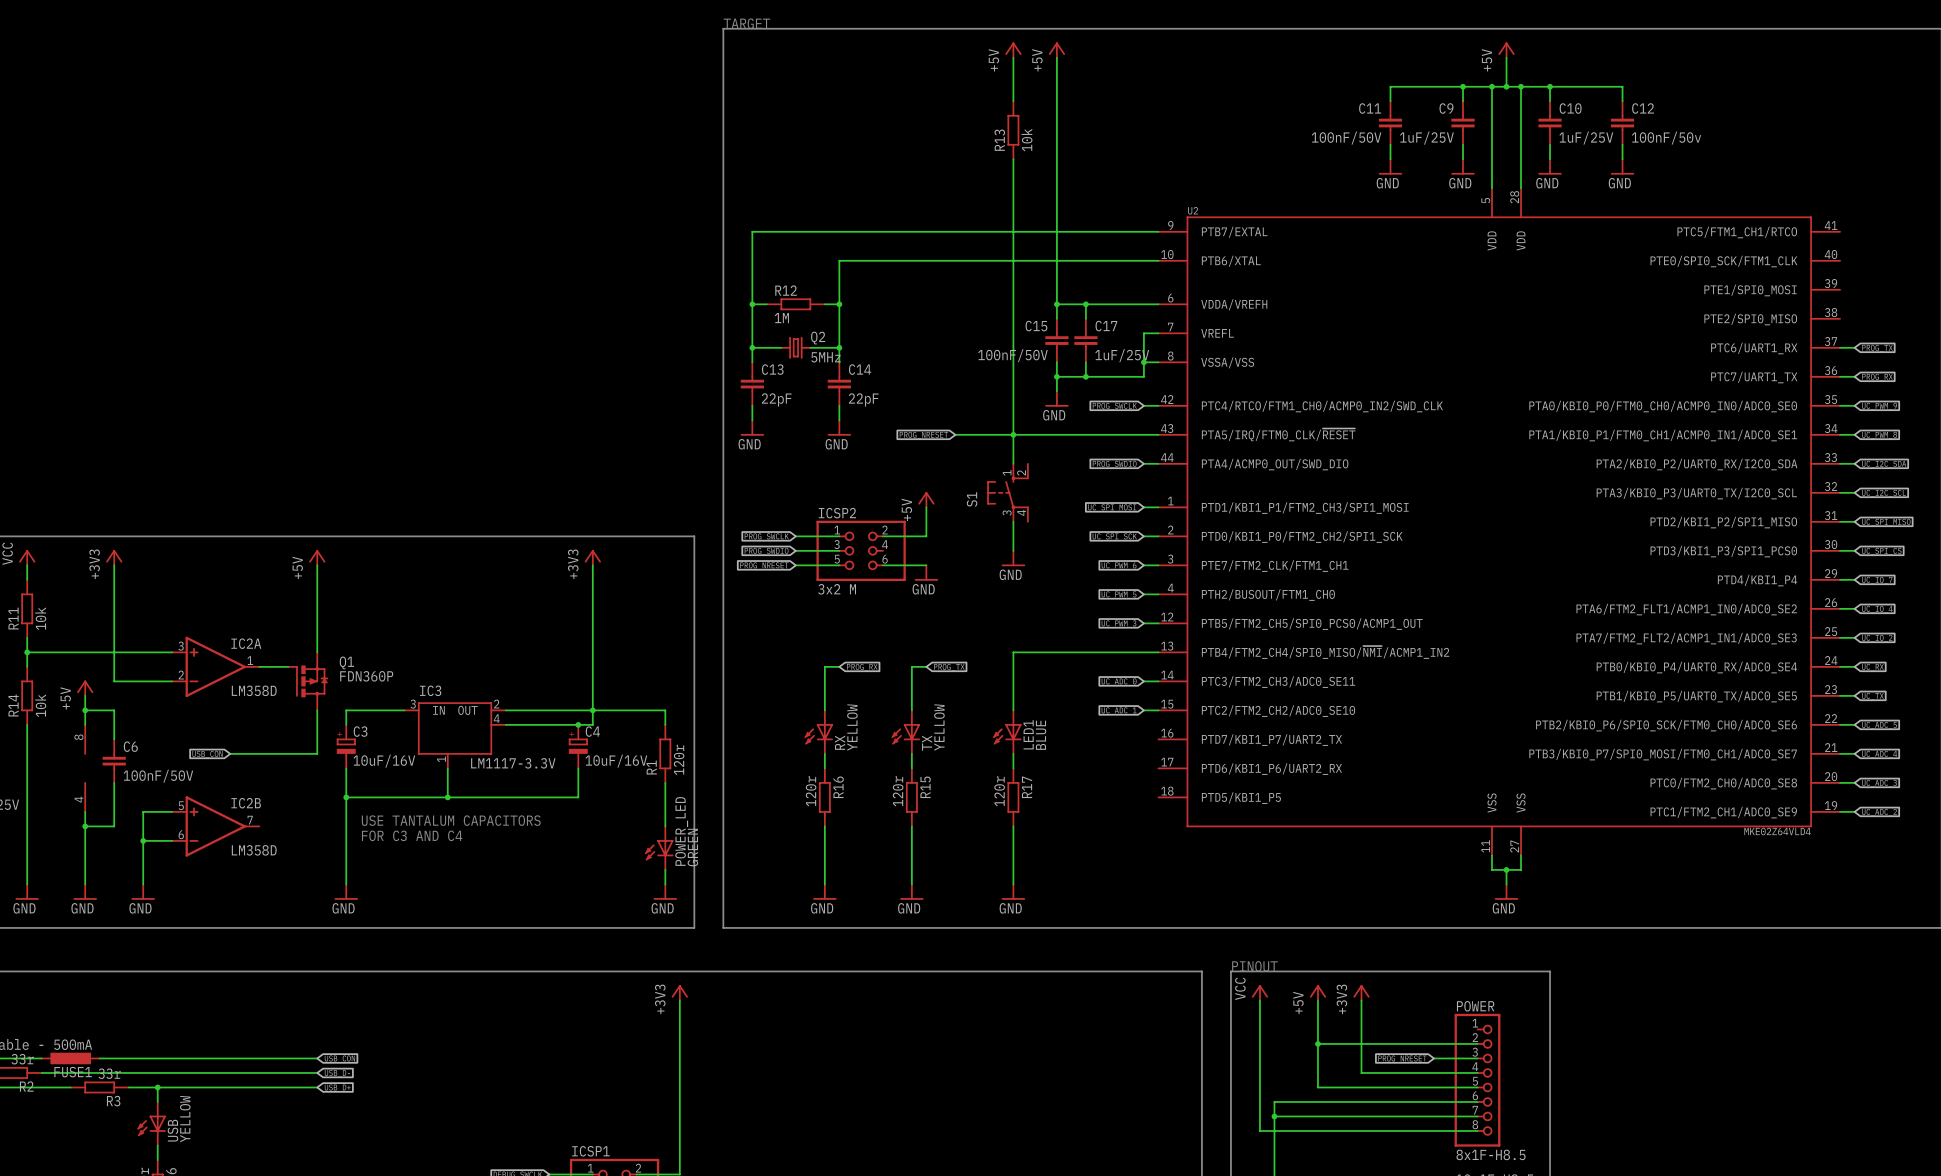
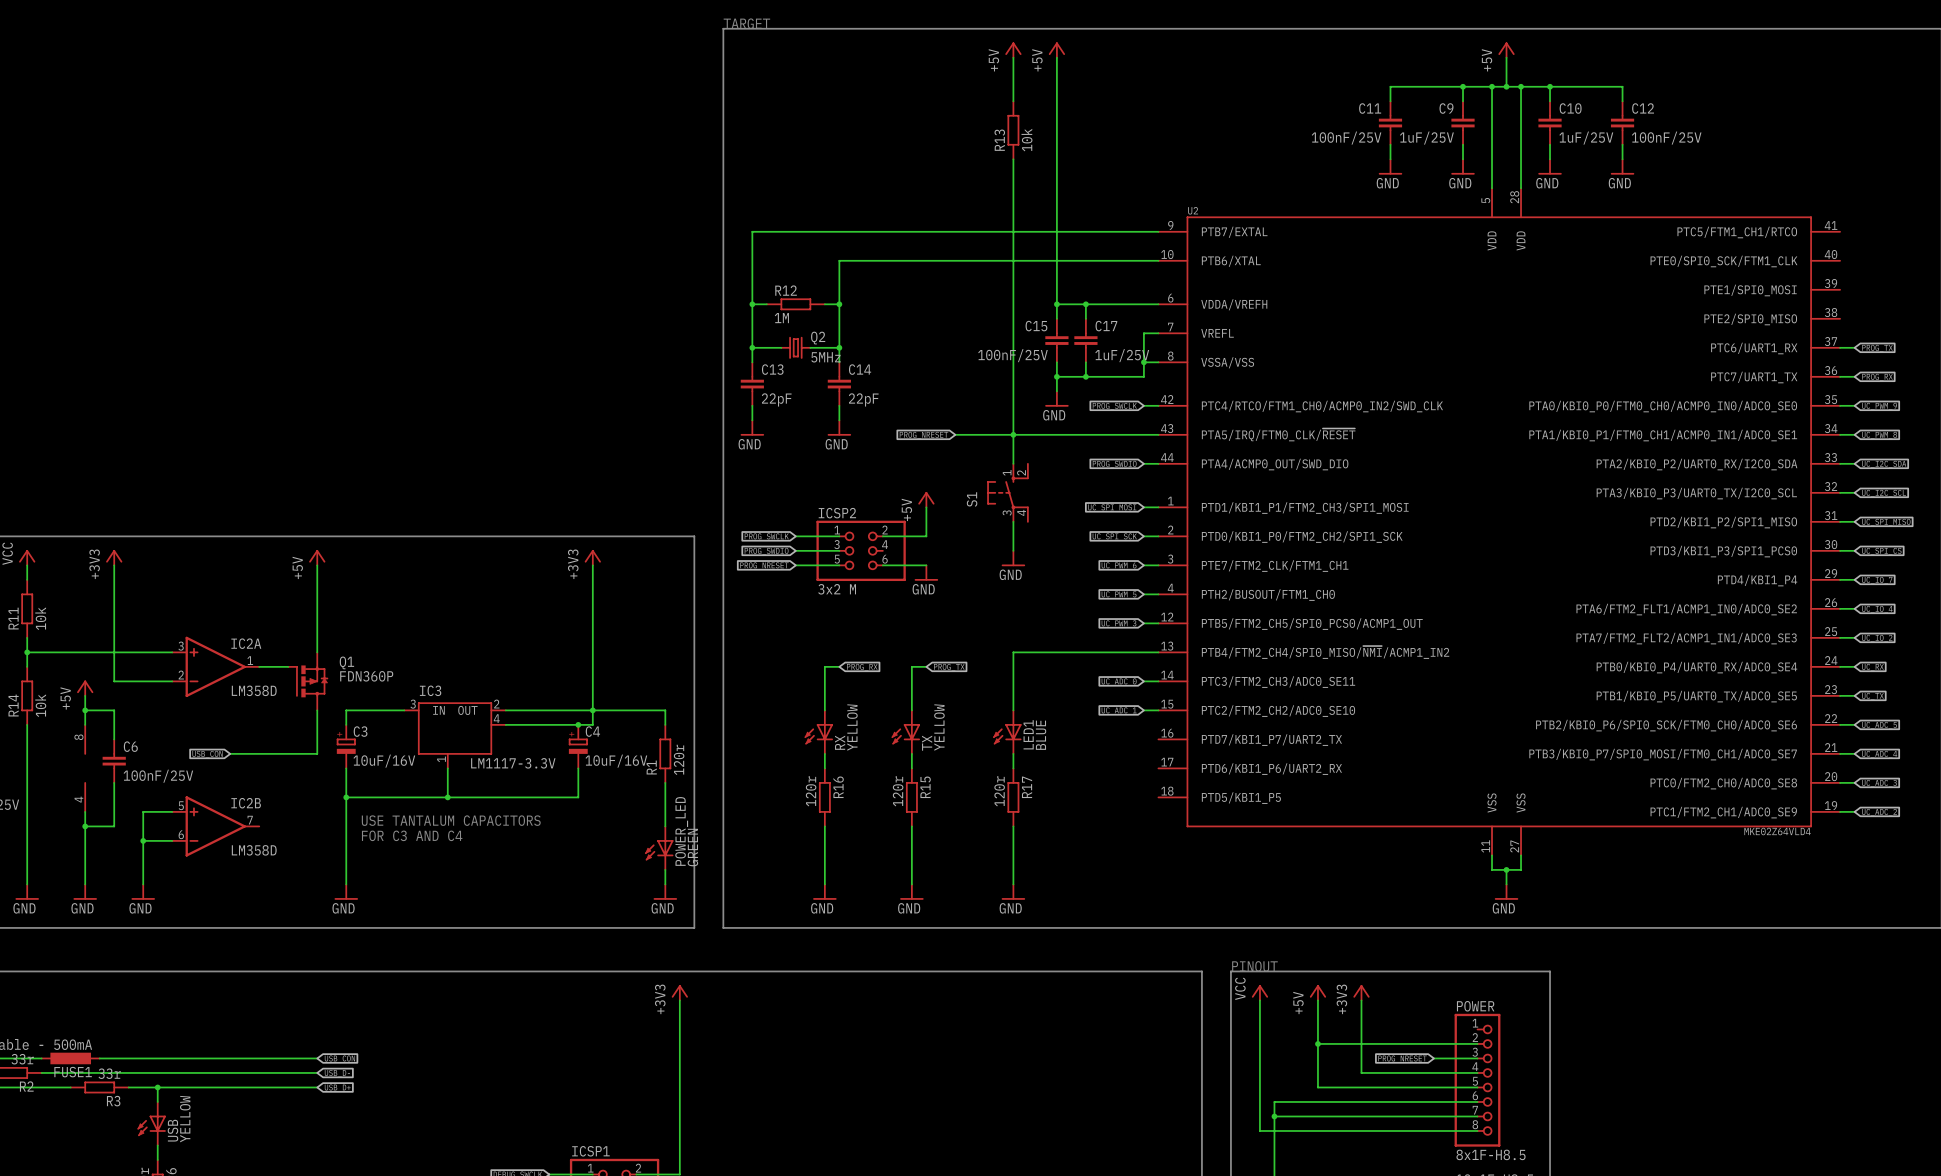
C11 value: 100nF/50V (1346, 138) -> 100nF/25V (1346, 138)
C12 value: 100nF/50v (1666, 138) -> 100nF/25V (1666, 138)
C15 value: 100nF/50V (1012, 355) -> 100nF/25V (1012, 355)
C6 value: 100nF/50V (158, 776) -> 100nF/25V (158, 776)

